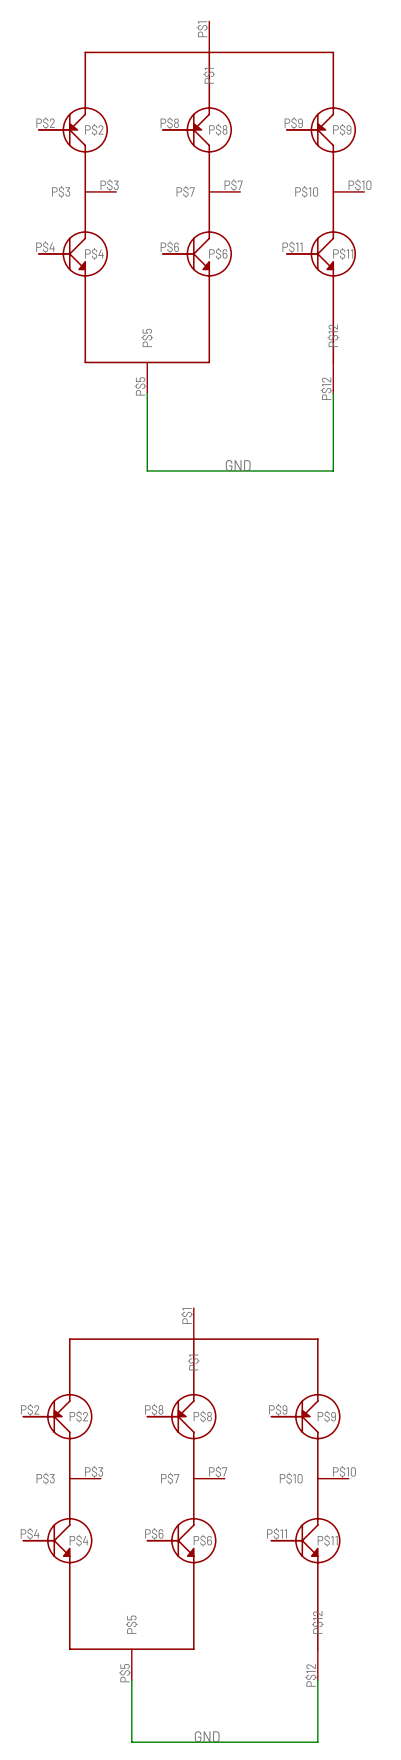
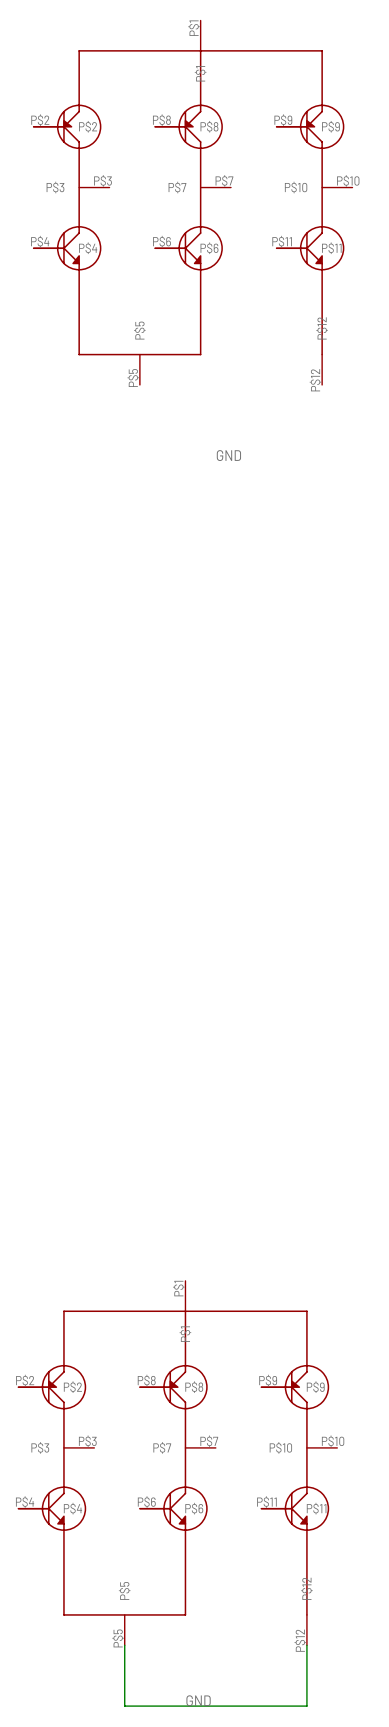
wire: (147, 393) (147, 470) (333, 470) (333, 393) -> none

